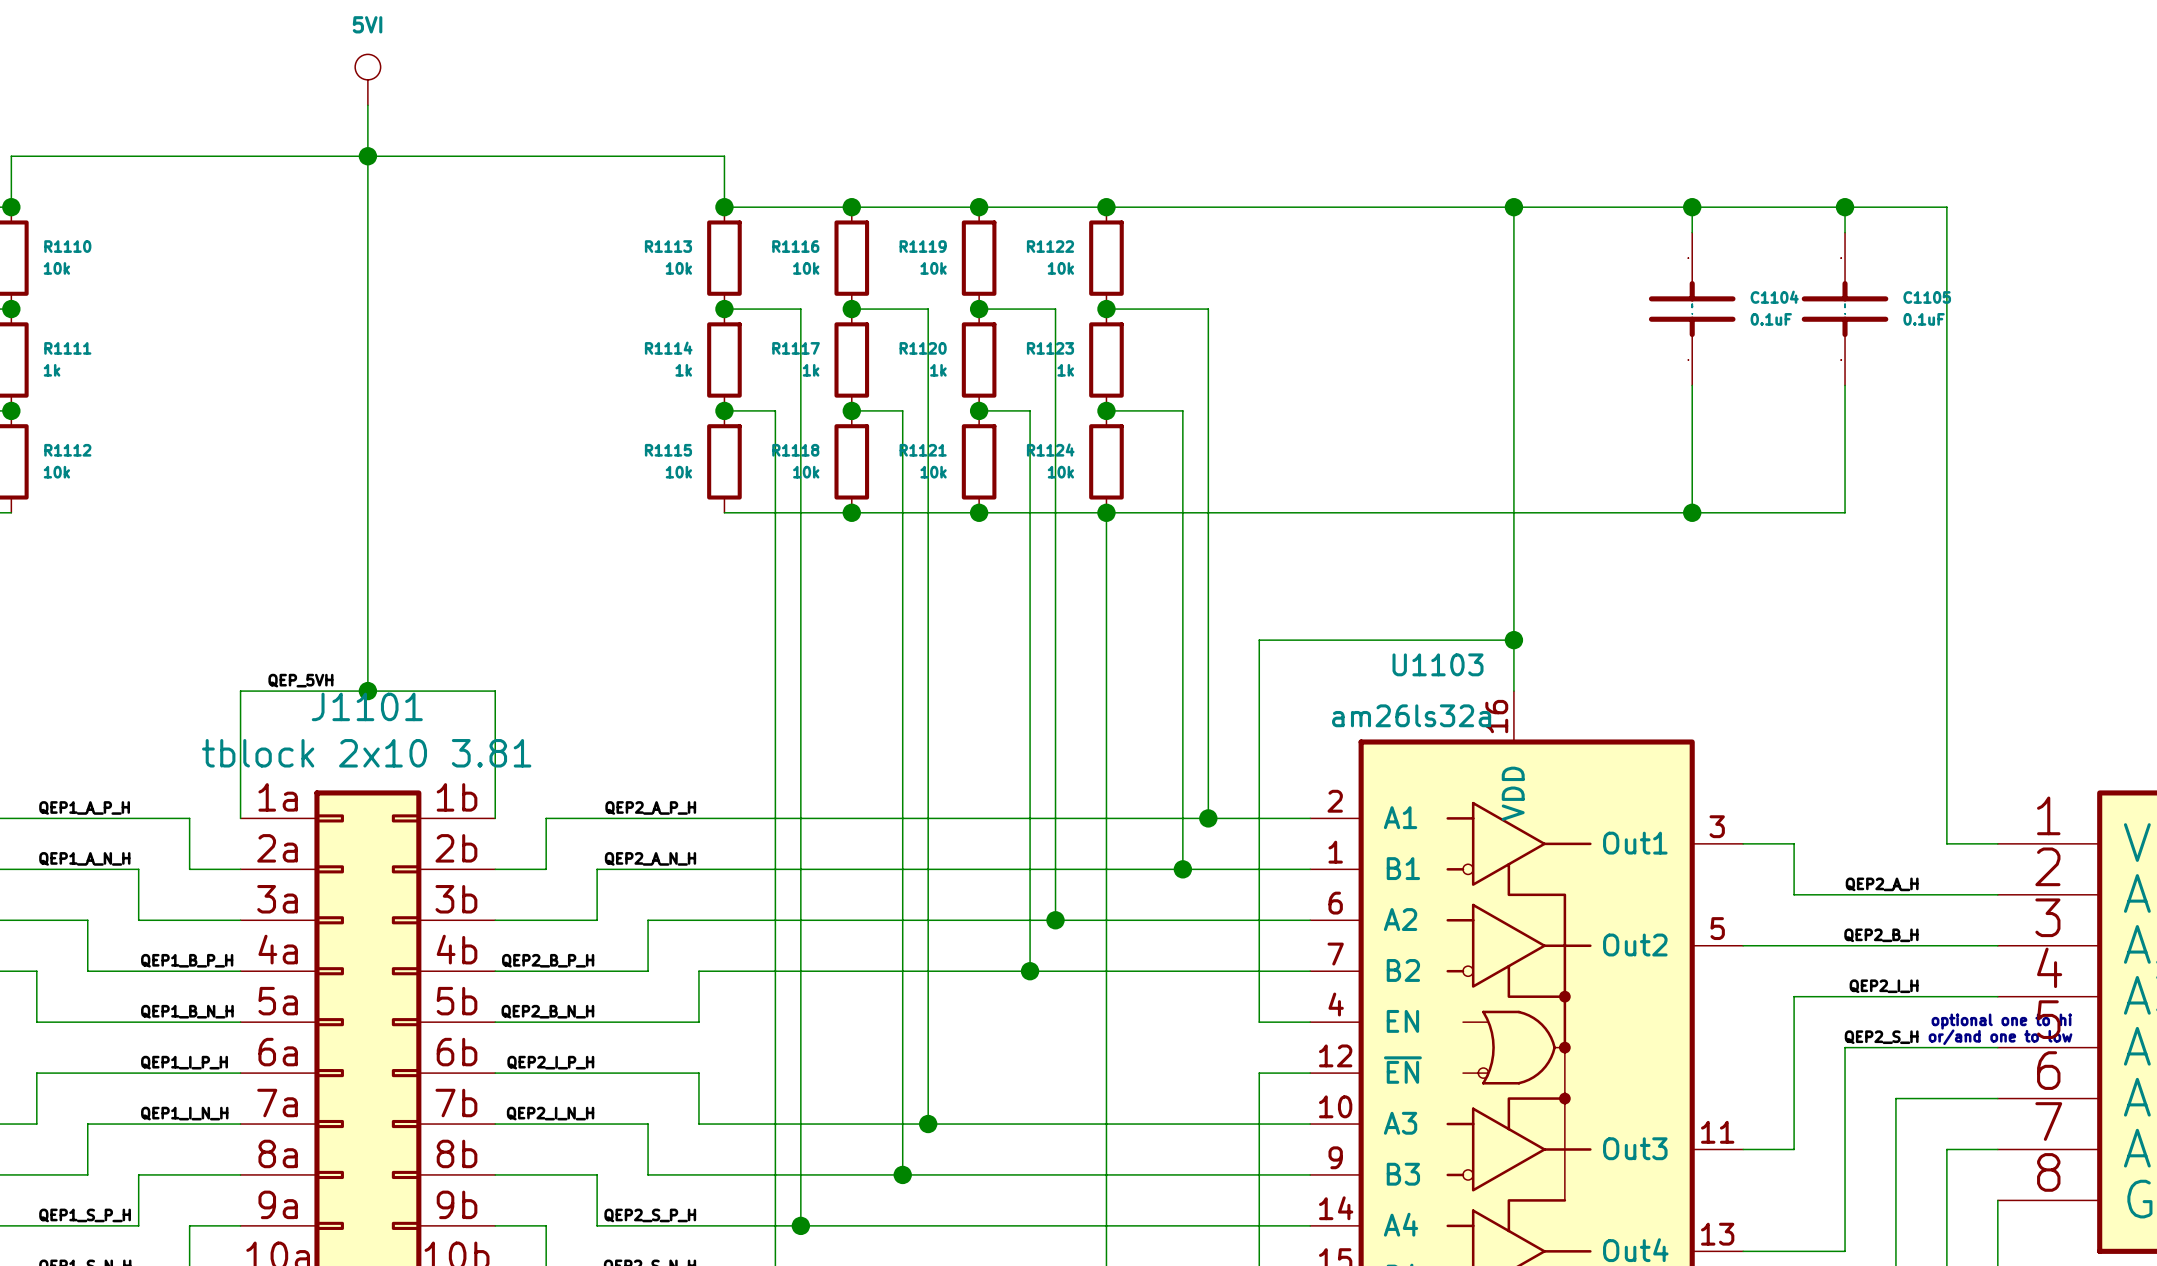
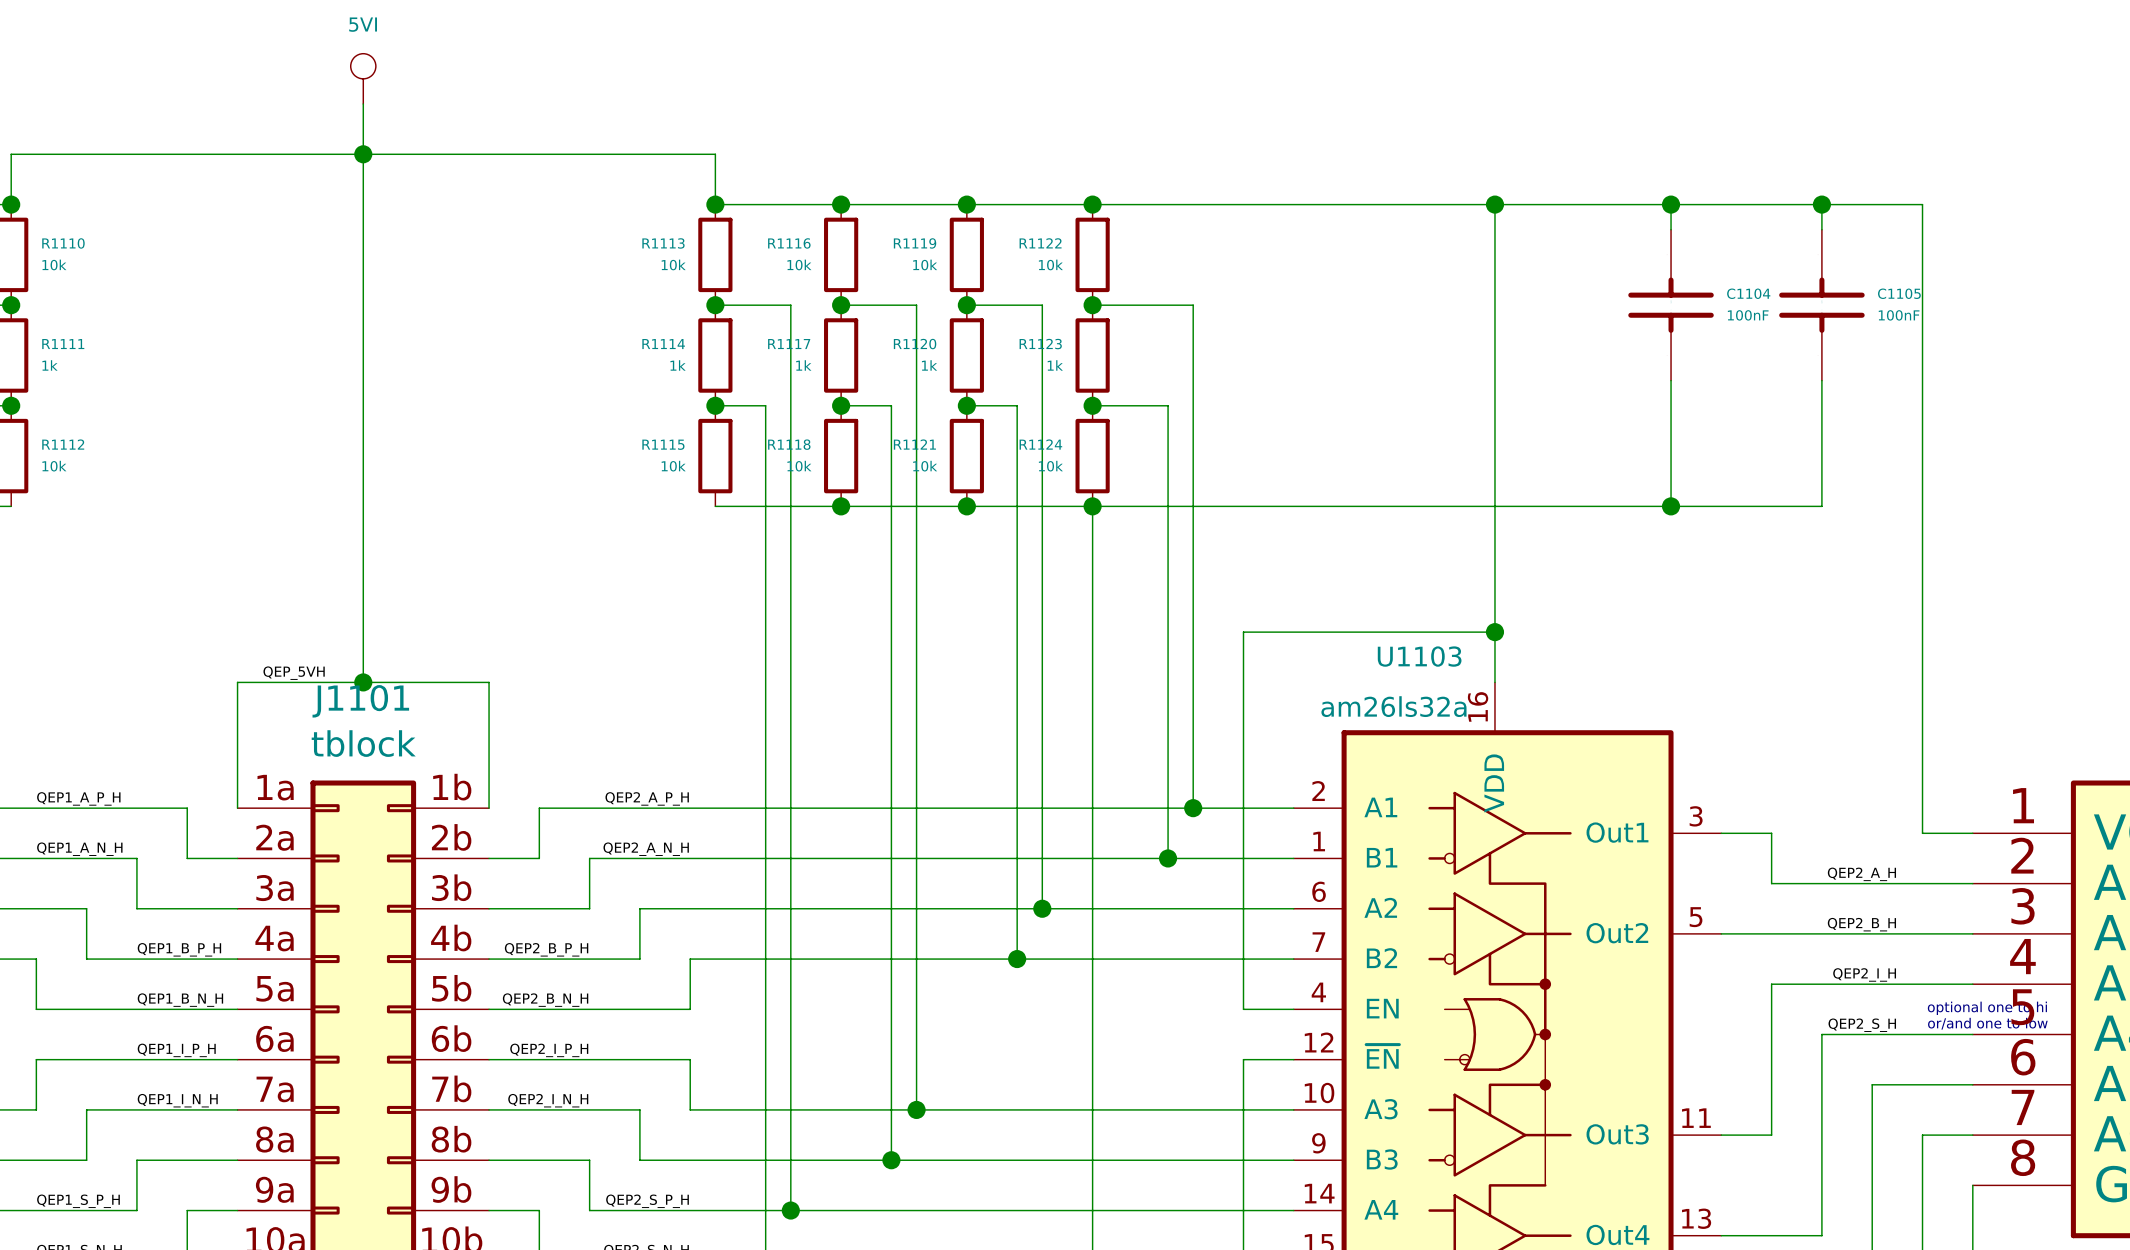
C1104 value: 0.1uF (1771, 319) -> 100nF (1748, 315)
C1105 value: 0.1uF (1924, 319) -> 100nF (1899, 315)
J1101 value: tblock 2x10 3.81 (366, 753) -> tblock (363, 743)

